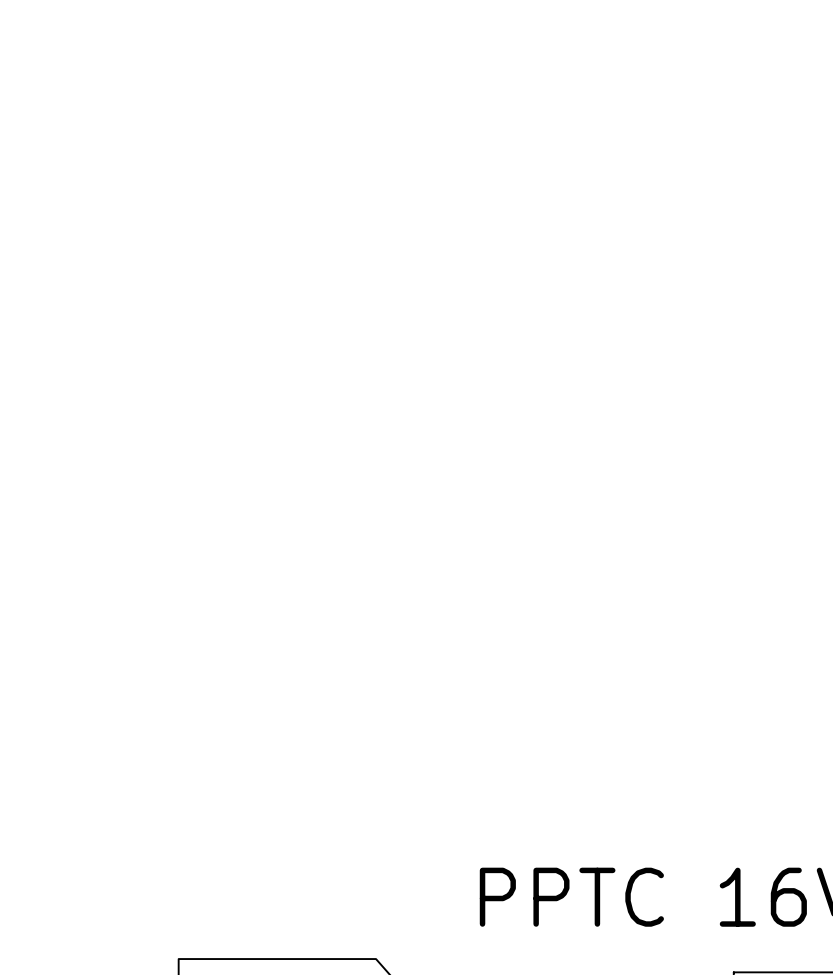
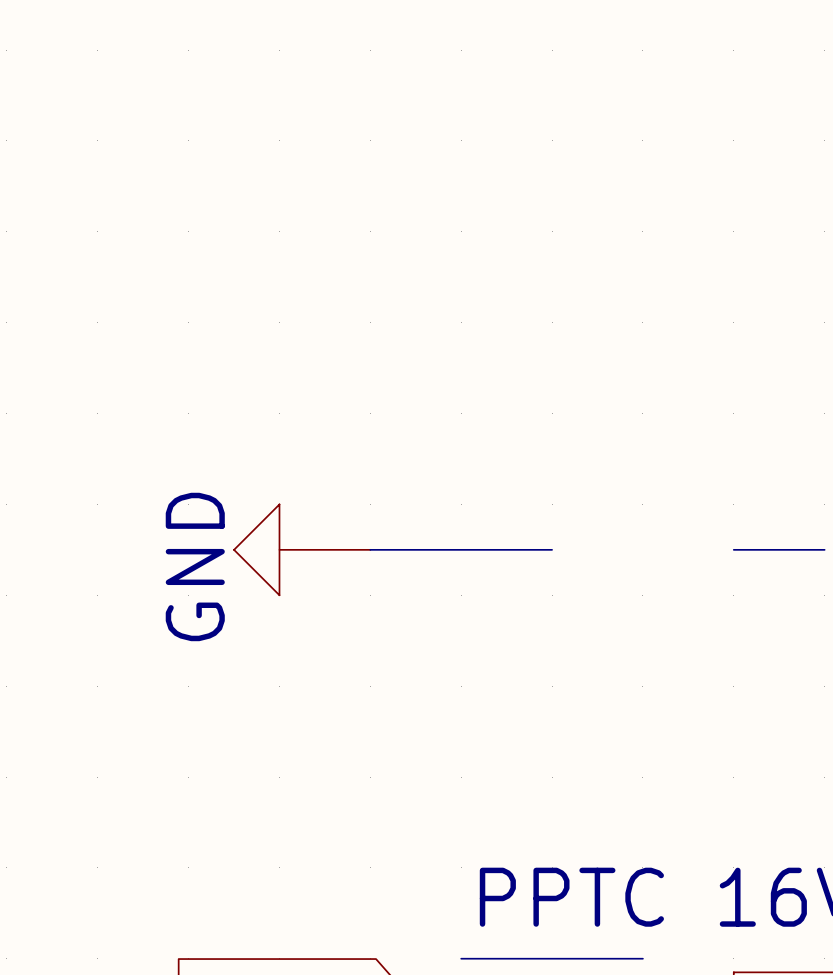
power symbol: none -> GND (302, 549)
wire: none -> (370, 549) (552, 549)
wire: none -> (733, 549) (824, 549)
wire: none -> (461, 958) (642, 958)

